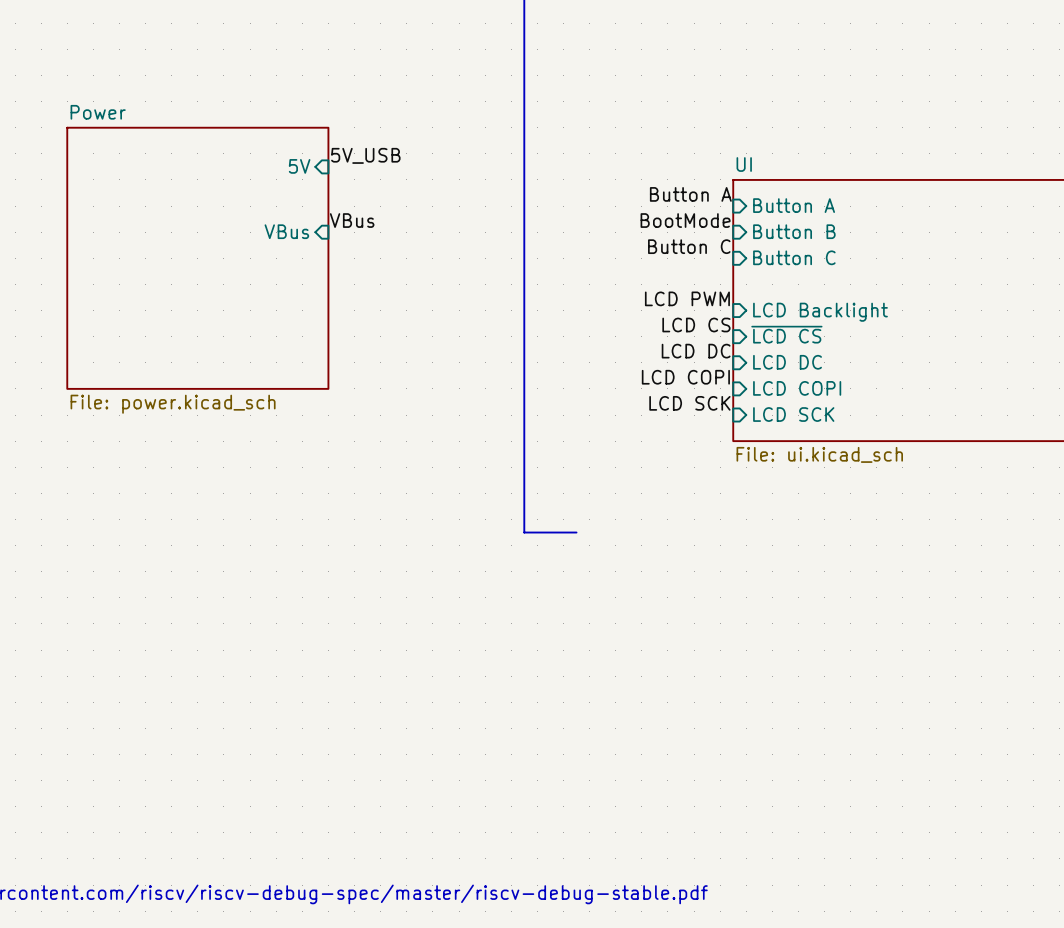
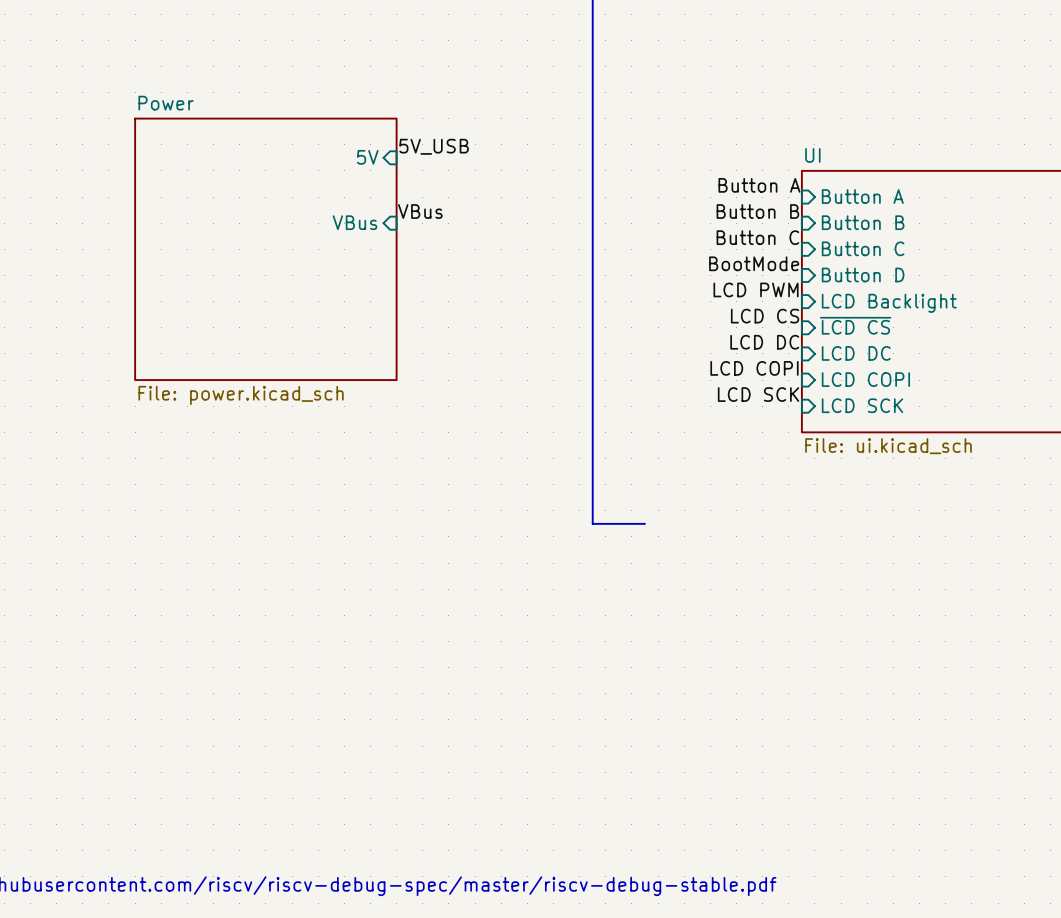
label: BootMode (685, 220) -> Button B (757, 211)
label: none -> BootMode (754, 263)
sheet pin: none -> Button D (863, 274)

